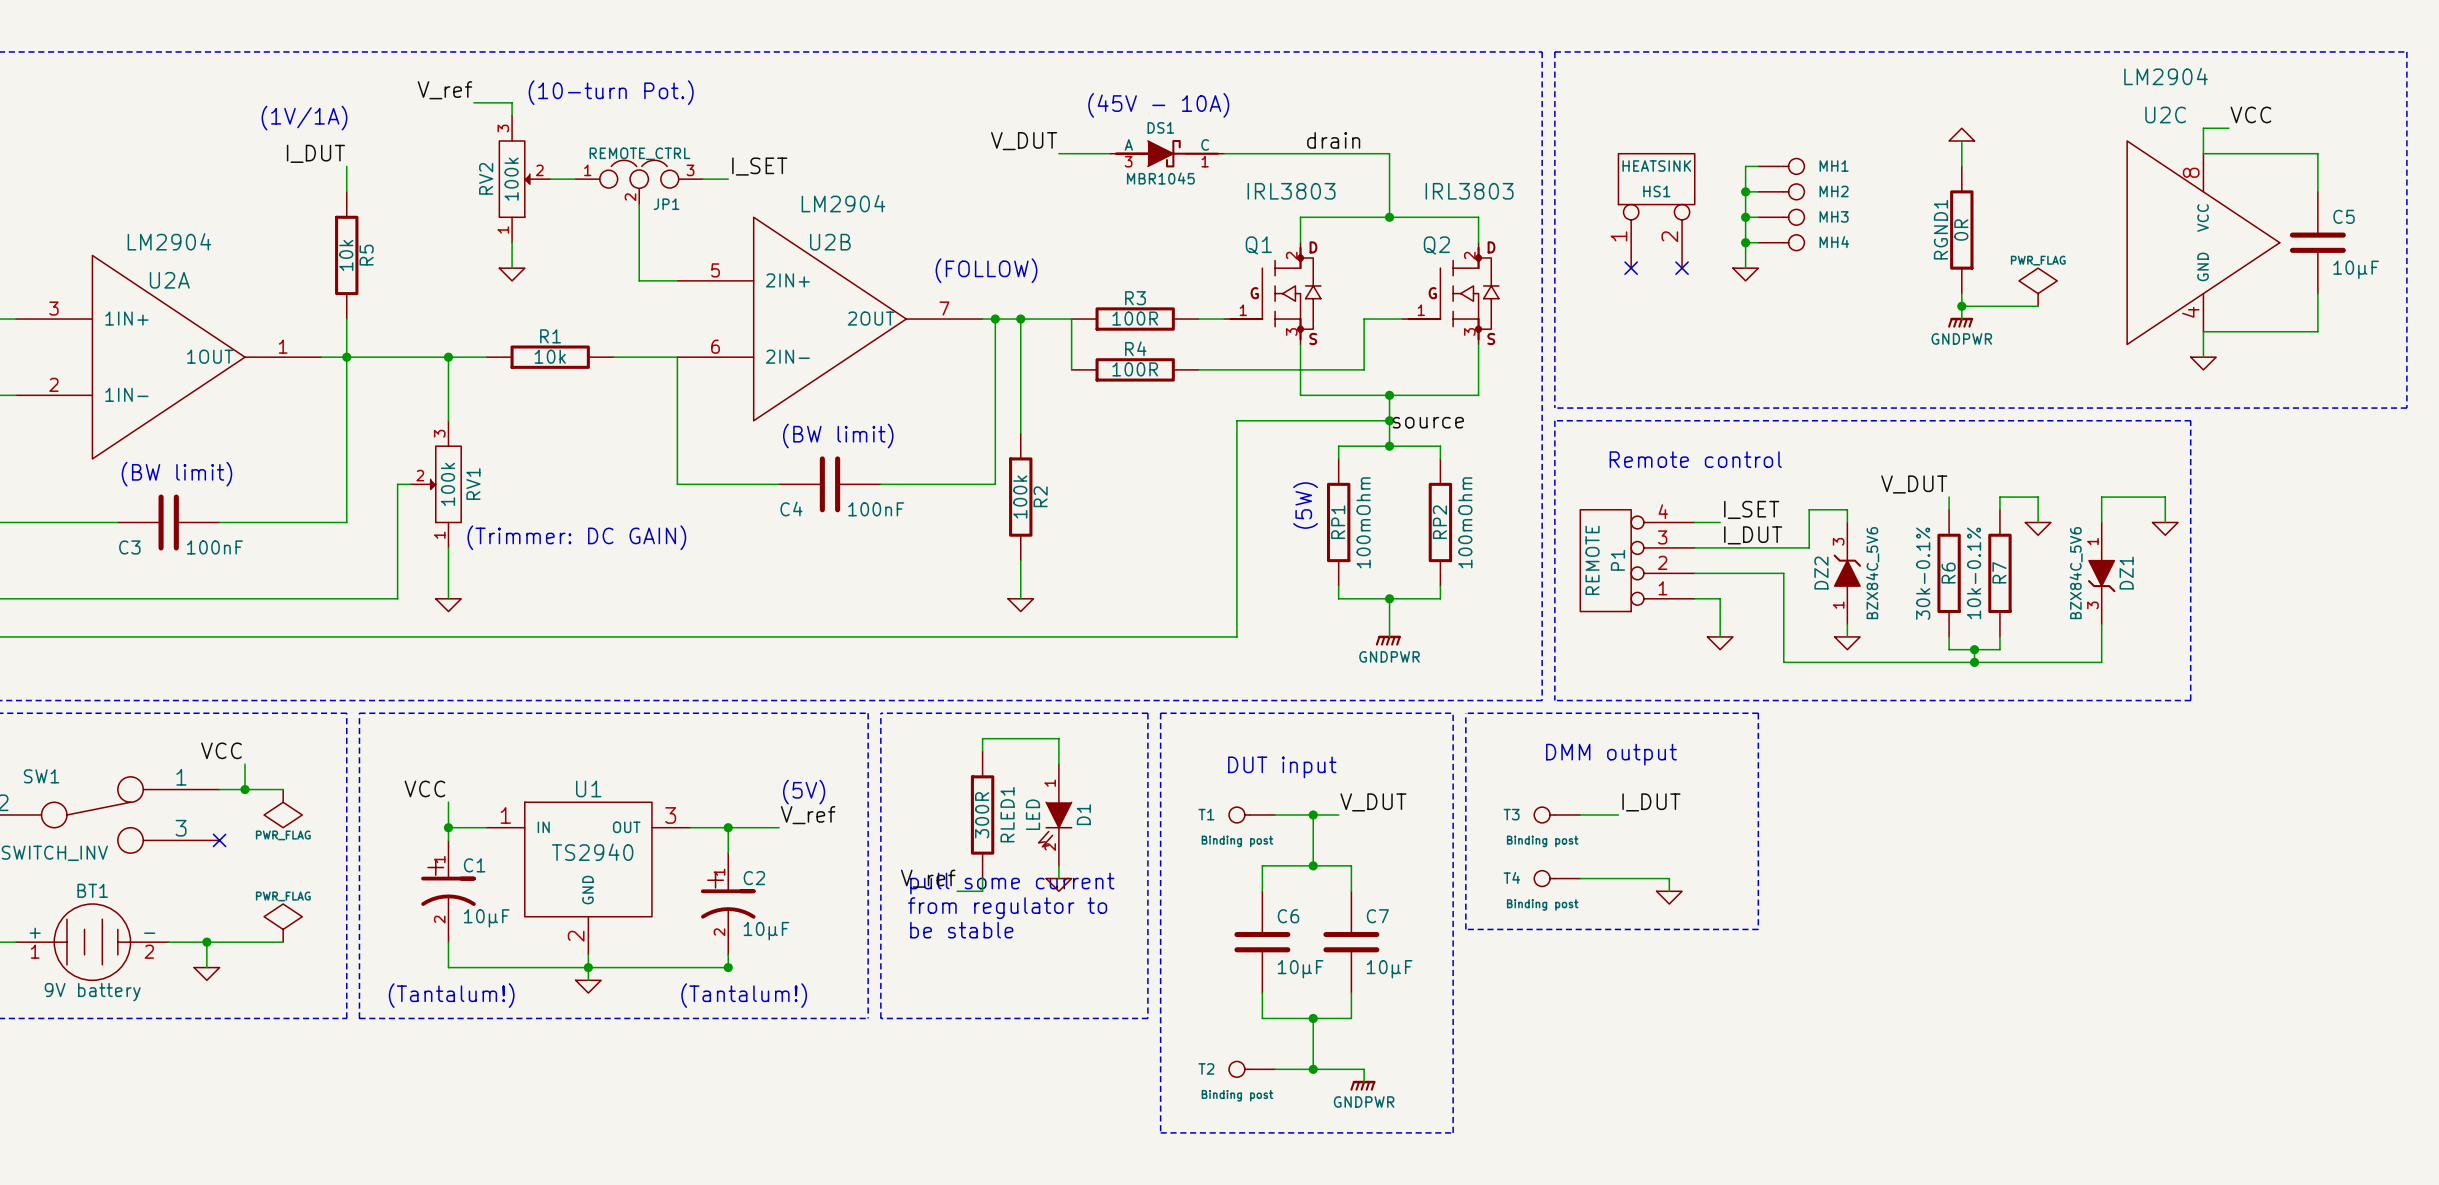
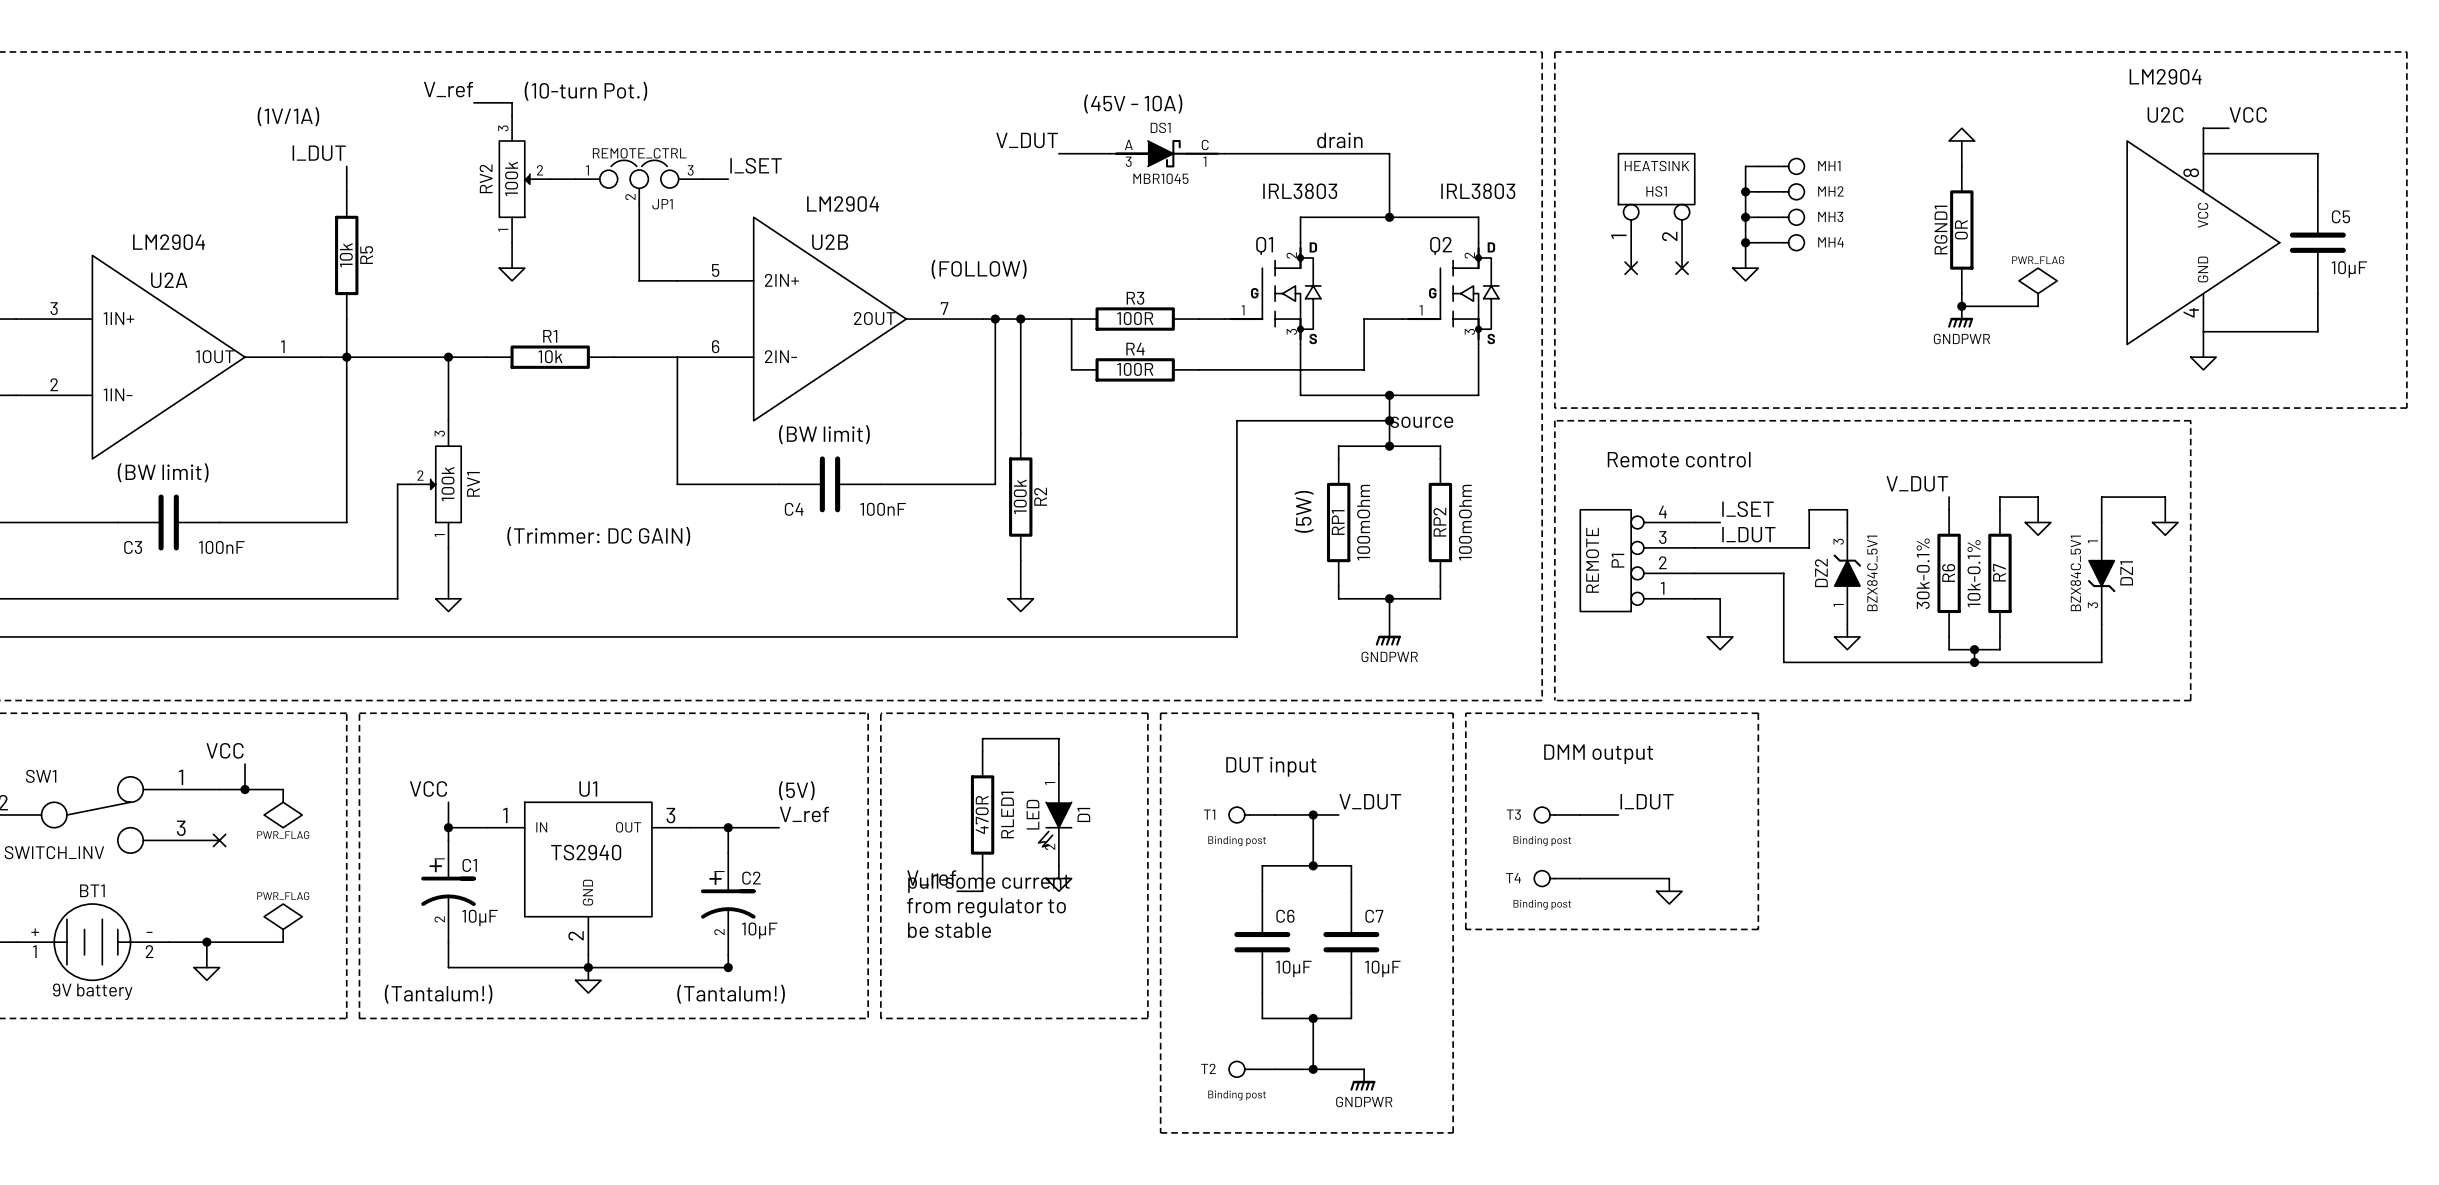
DZ2 value: BZX84C_5V6 (1872, 573) -> BZX84C_5V1 (1872, 573)
DZ1 value: BZX84C_5V6 (2076, 573) -> BZX84C_5V1 (2075, 573)
RLED1 value: 300R (982, 815) -> 470R (982, 814)

